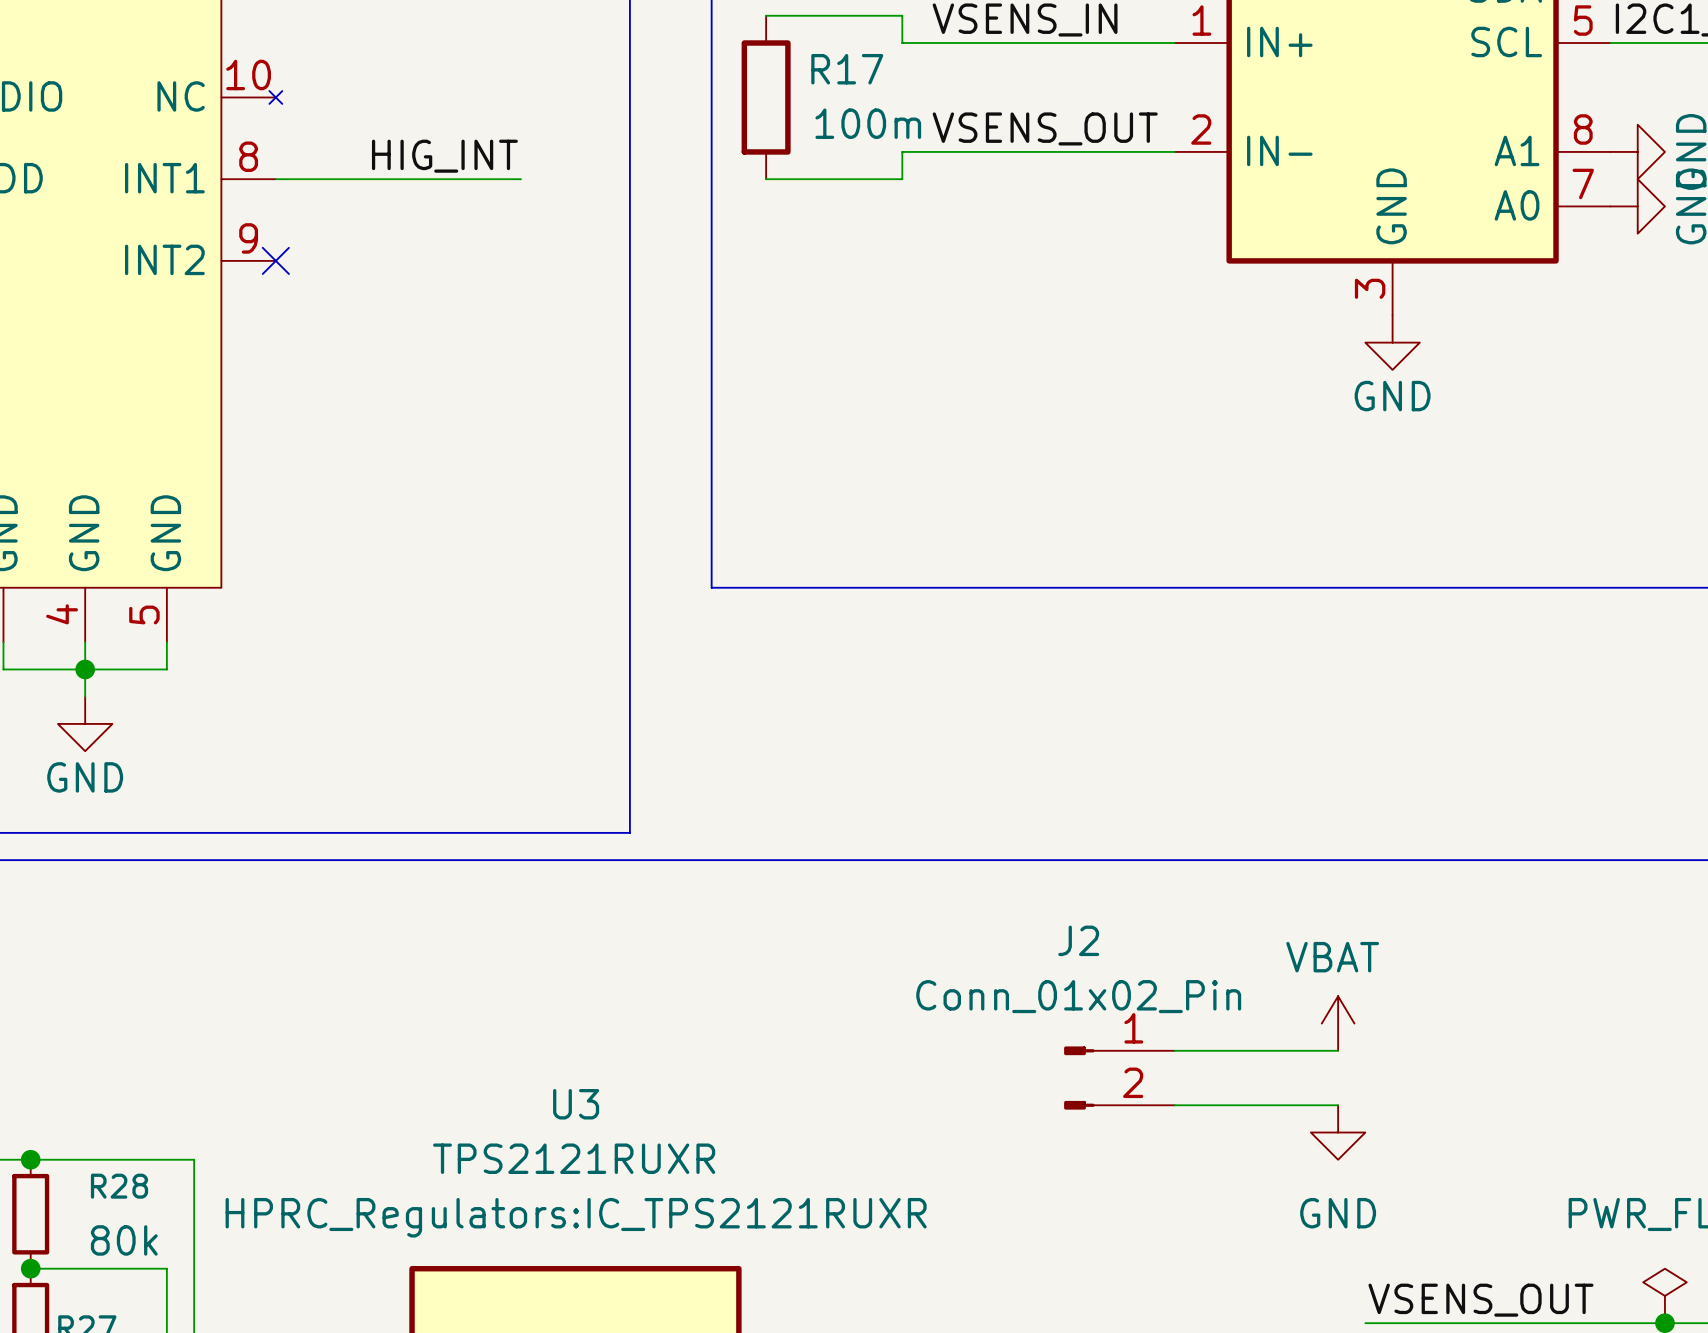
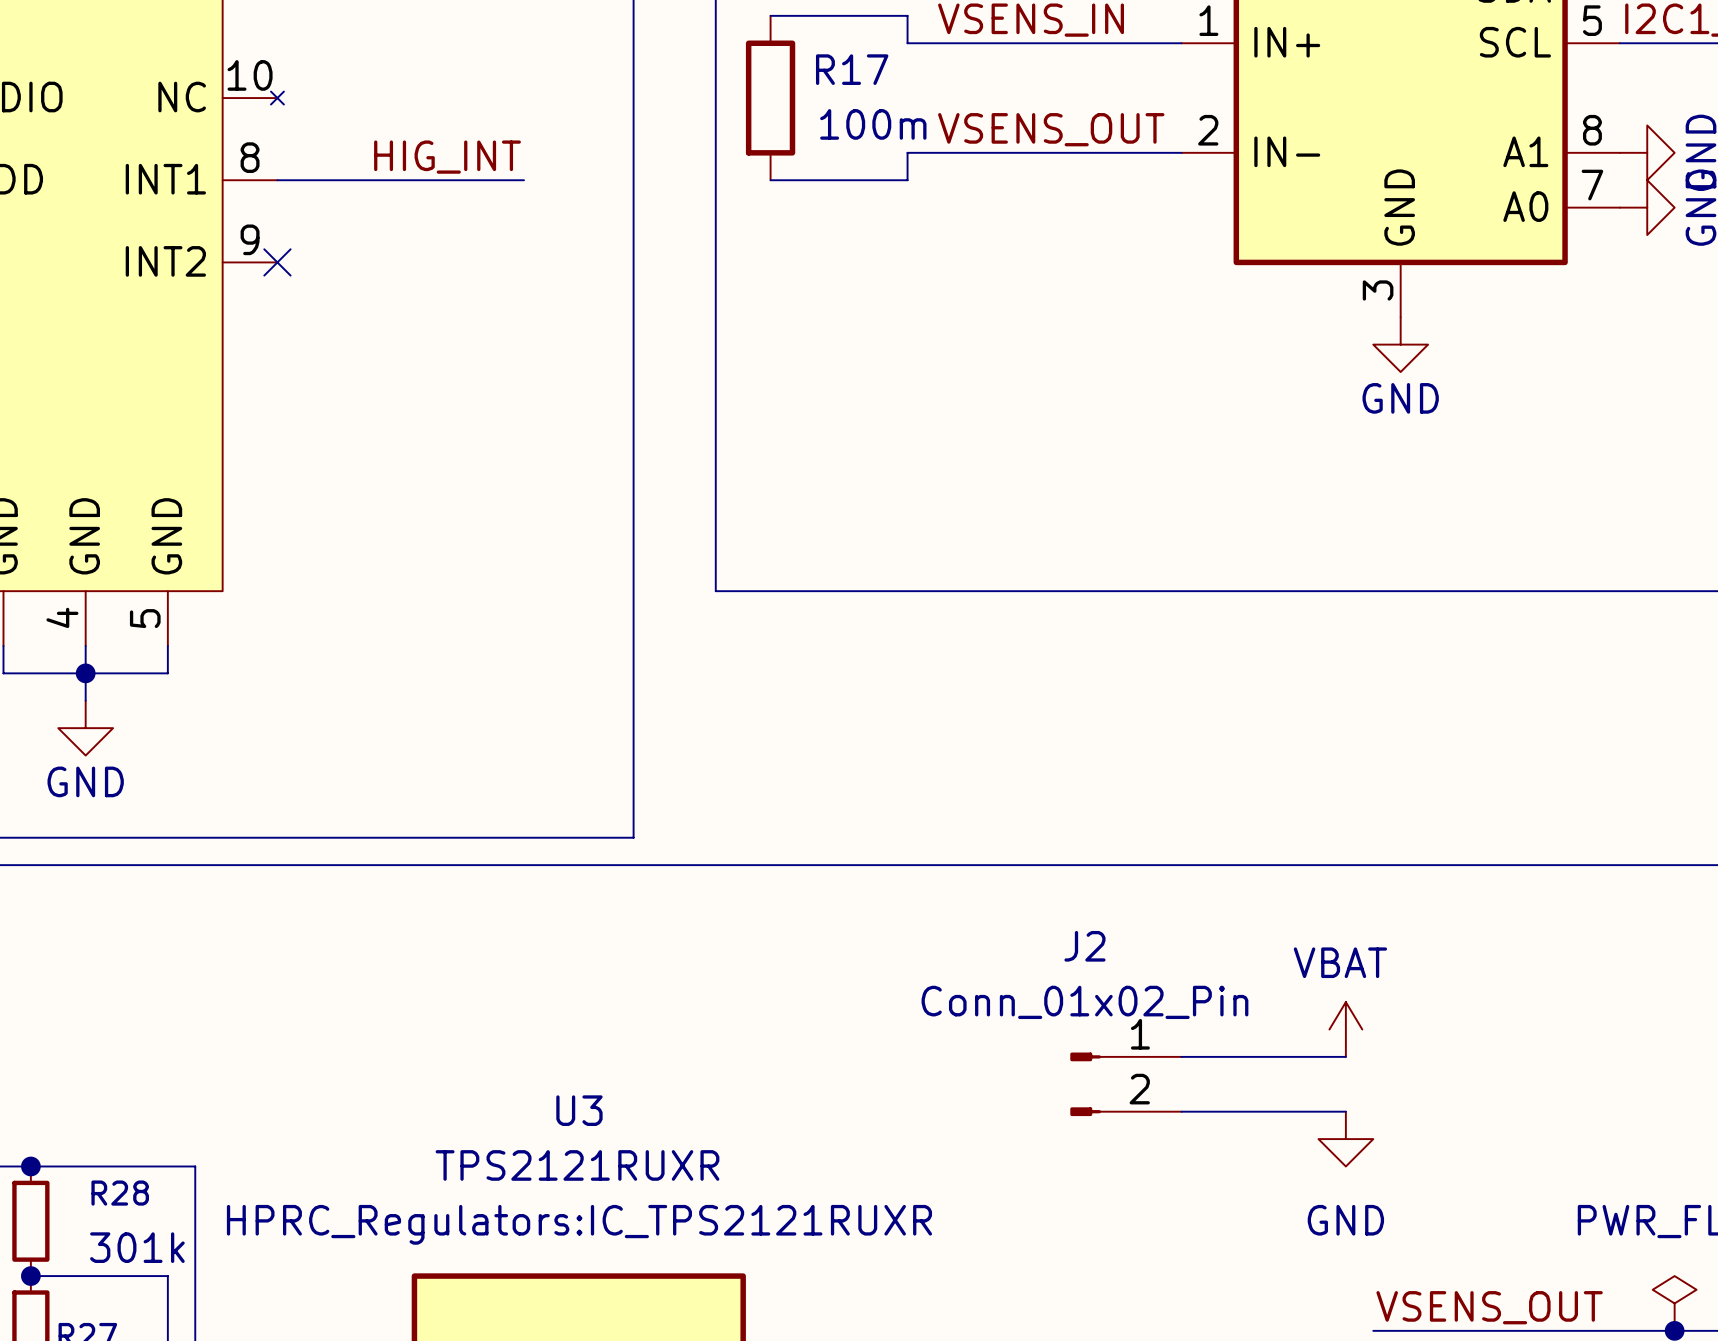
R28 value: 80k (124, 1240) -> 301k (137, 1247)

